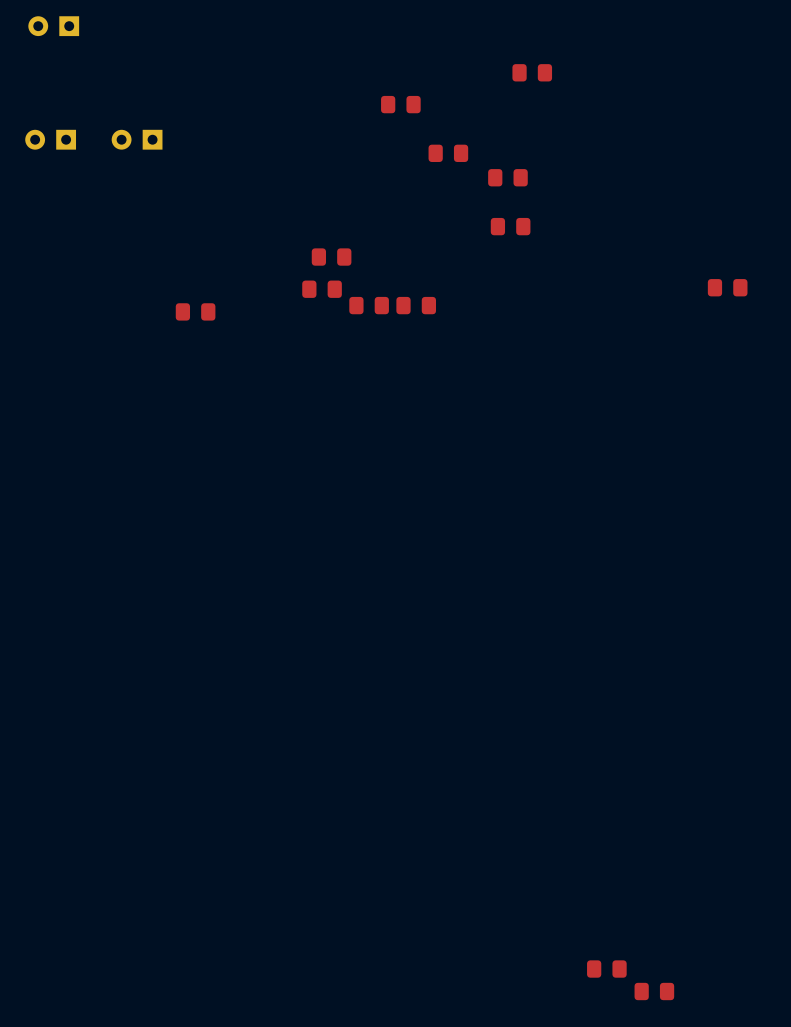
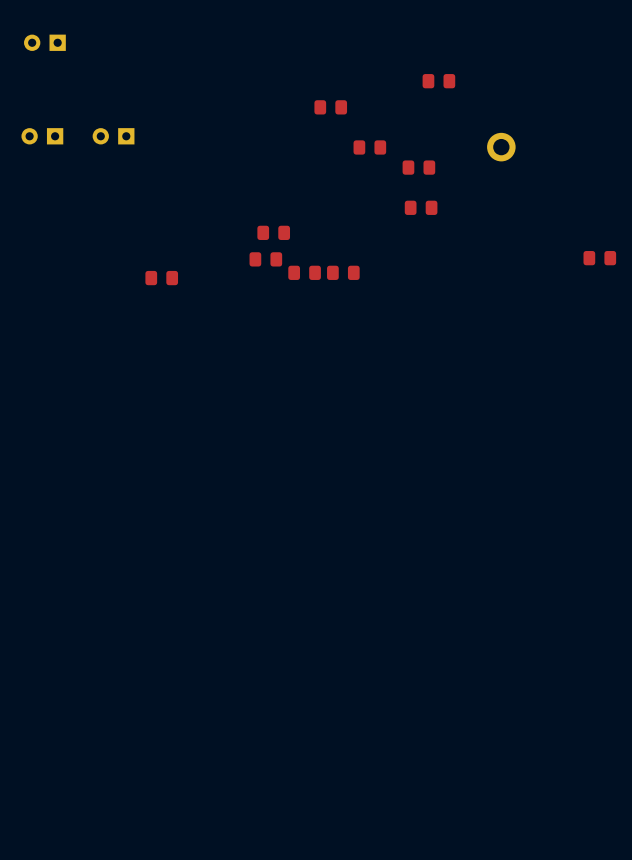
part: none -> (501, 147)
part: (606, 969) -> none
part: (654, 991) -> none

